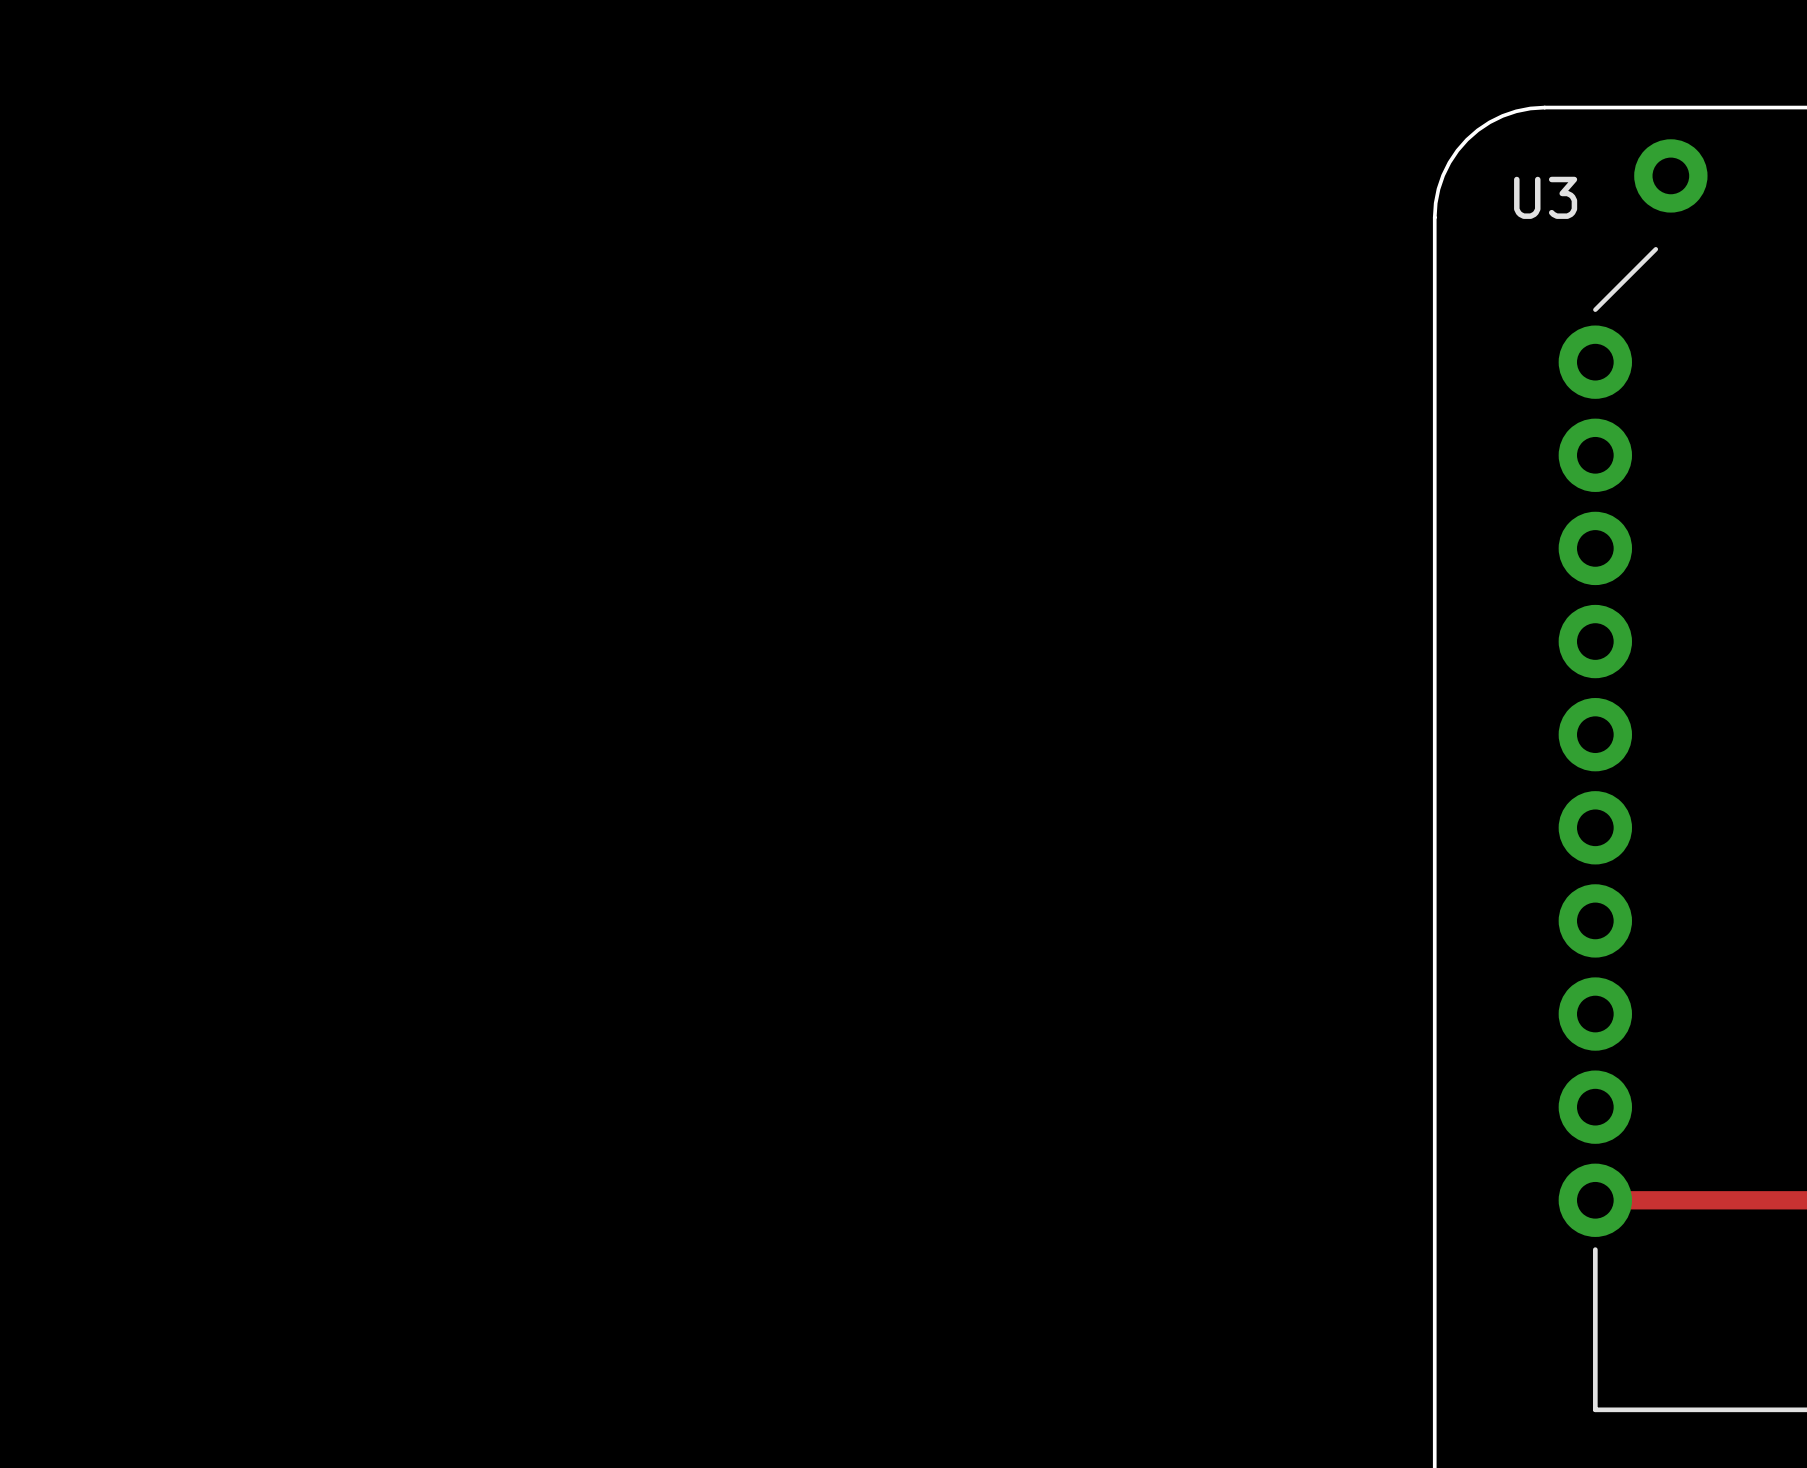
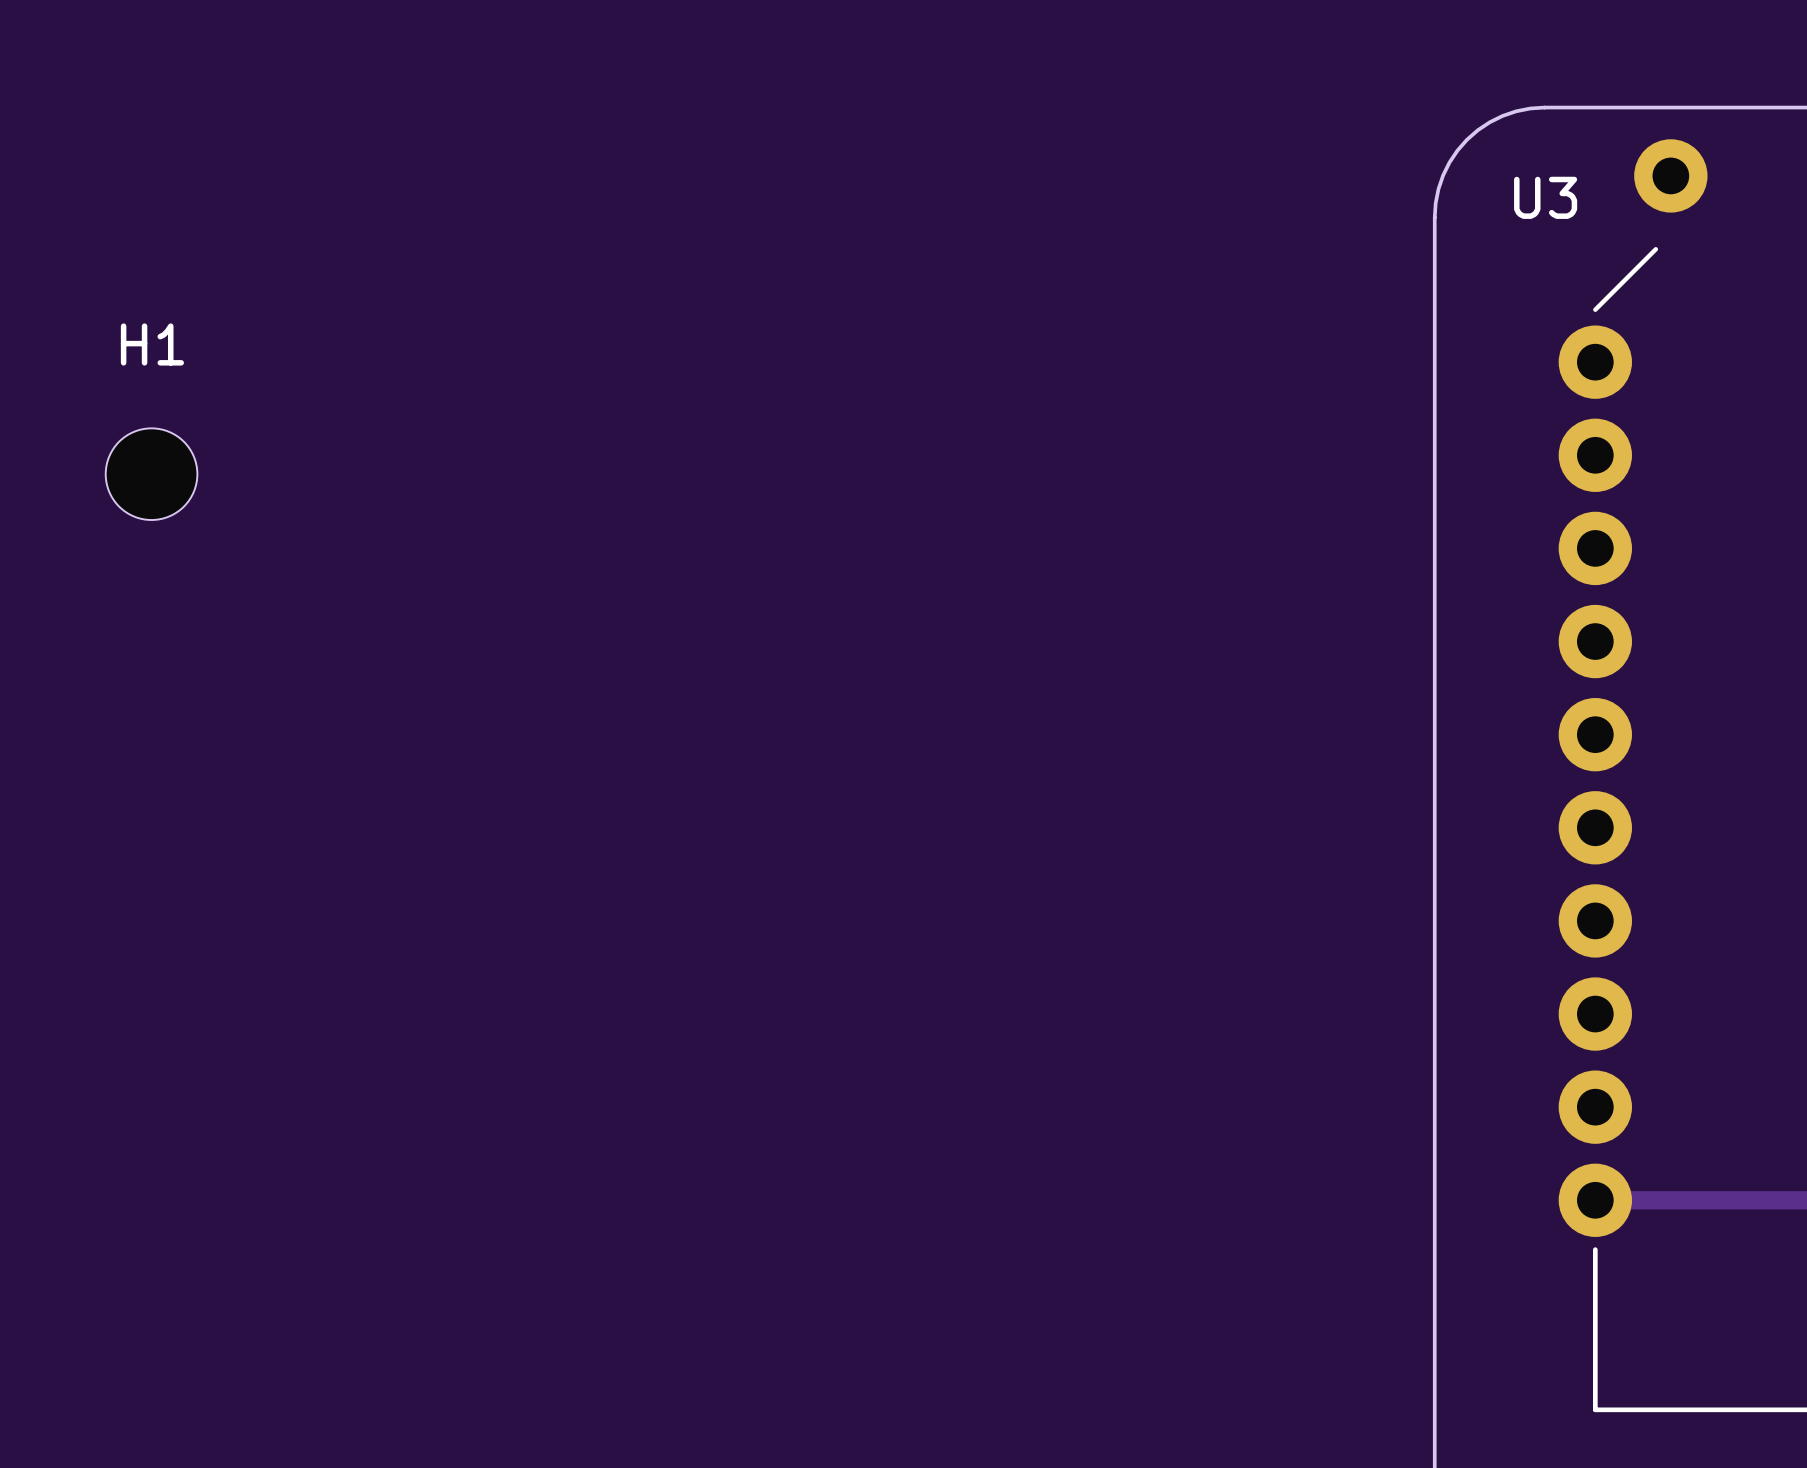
H1: none -> (151, 474)

